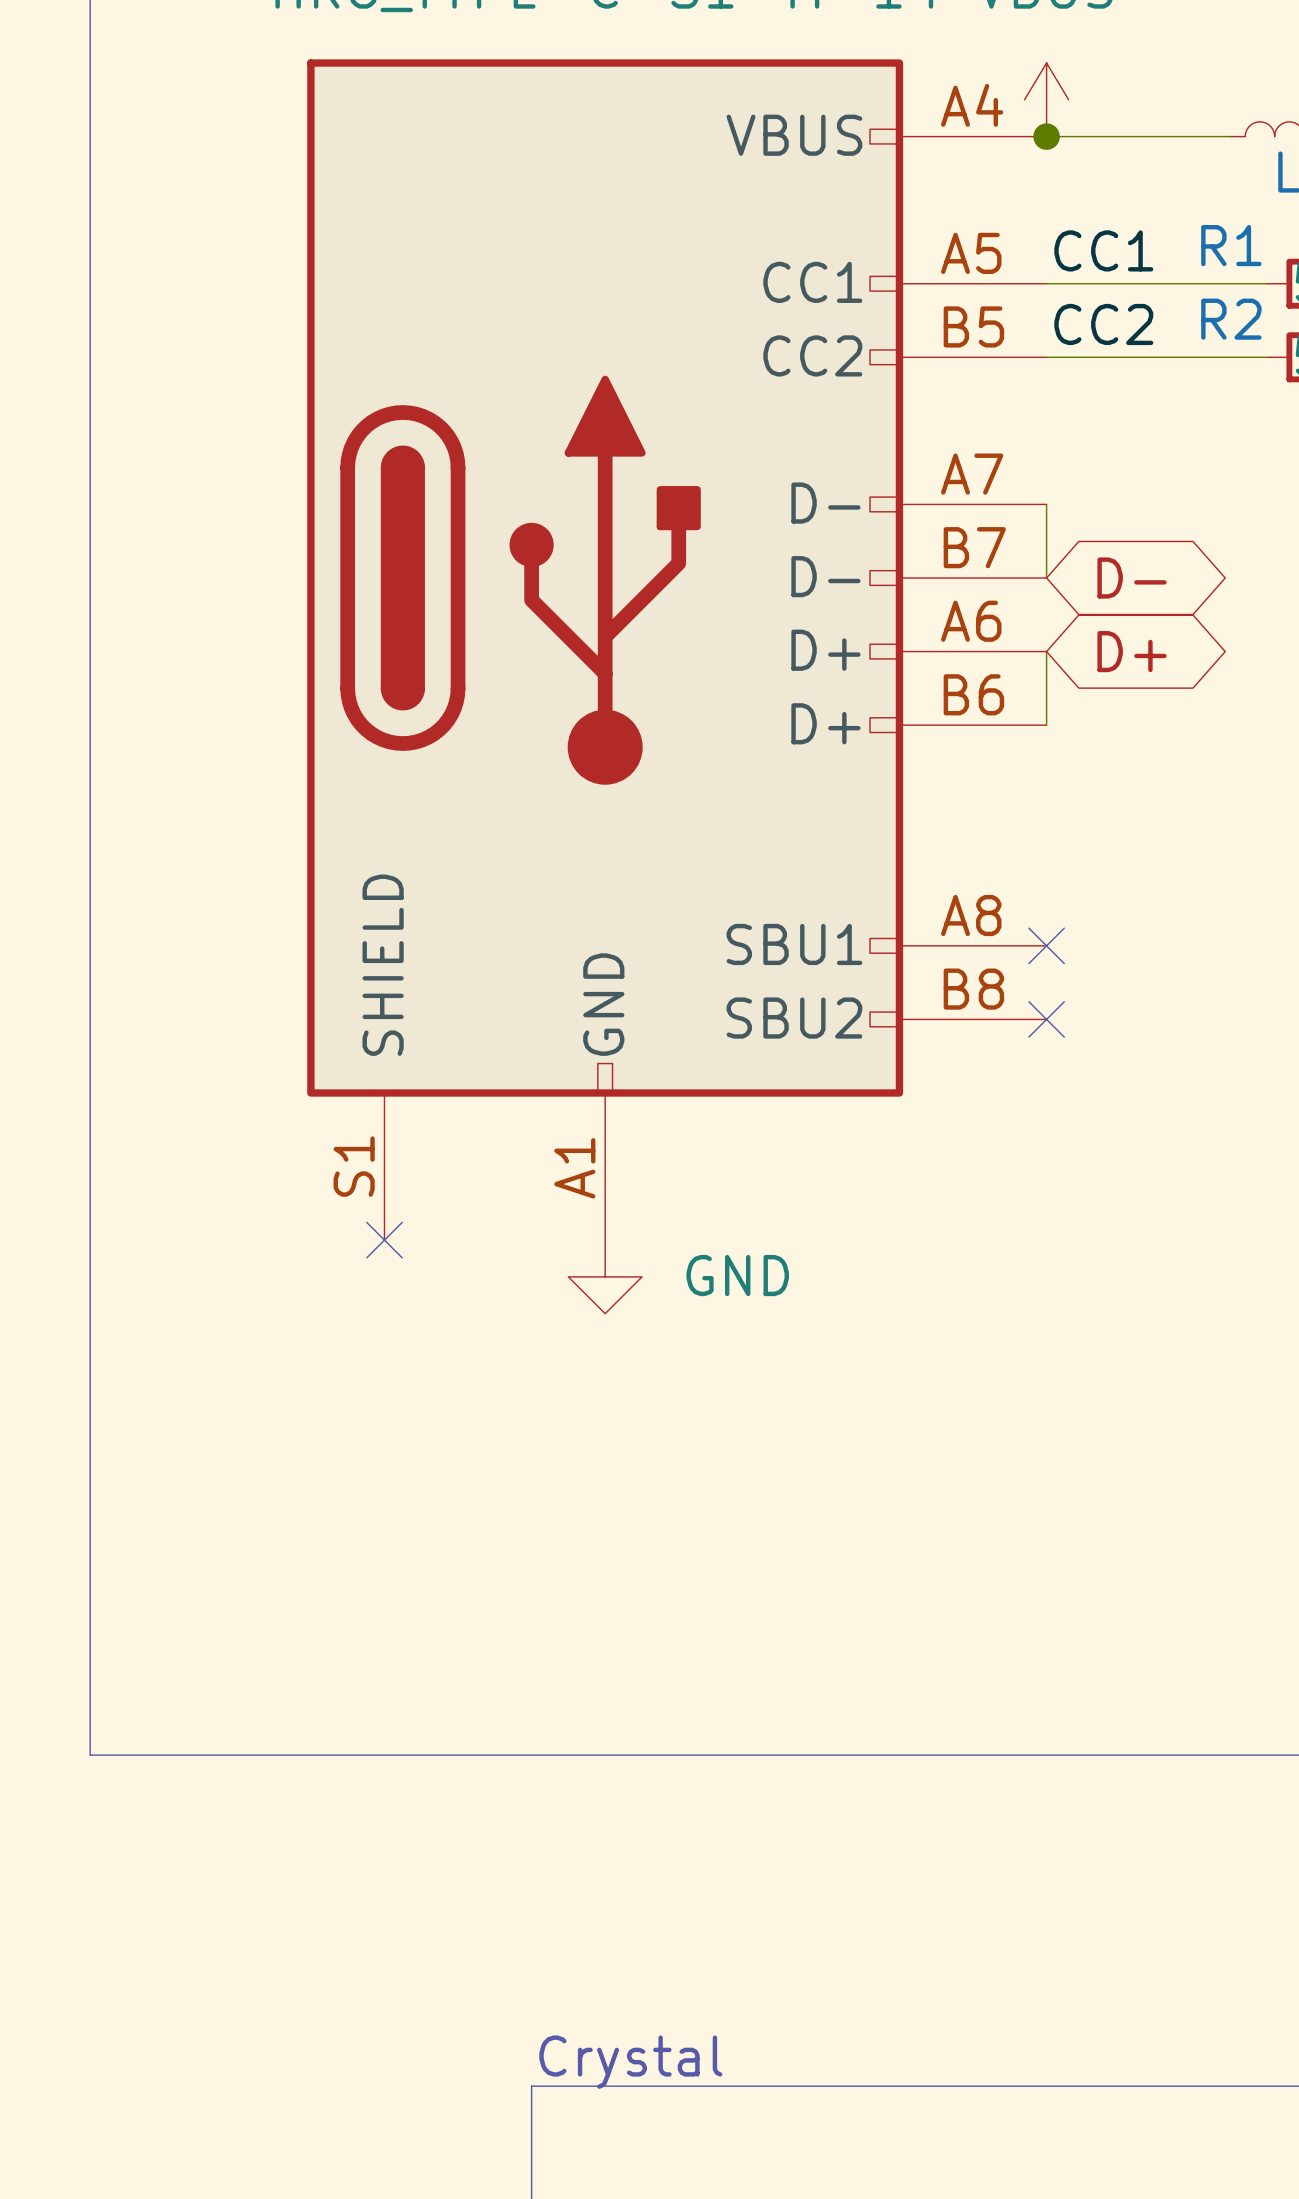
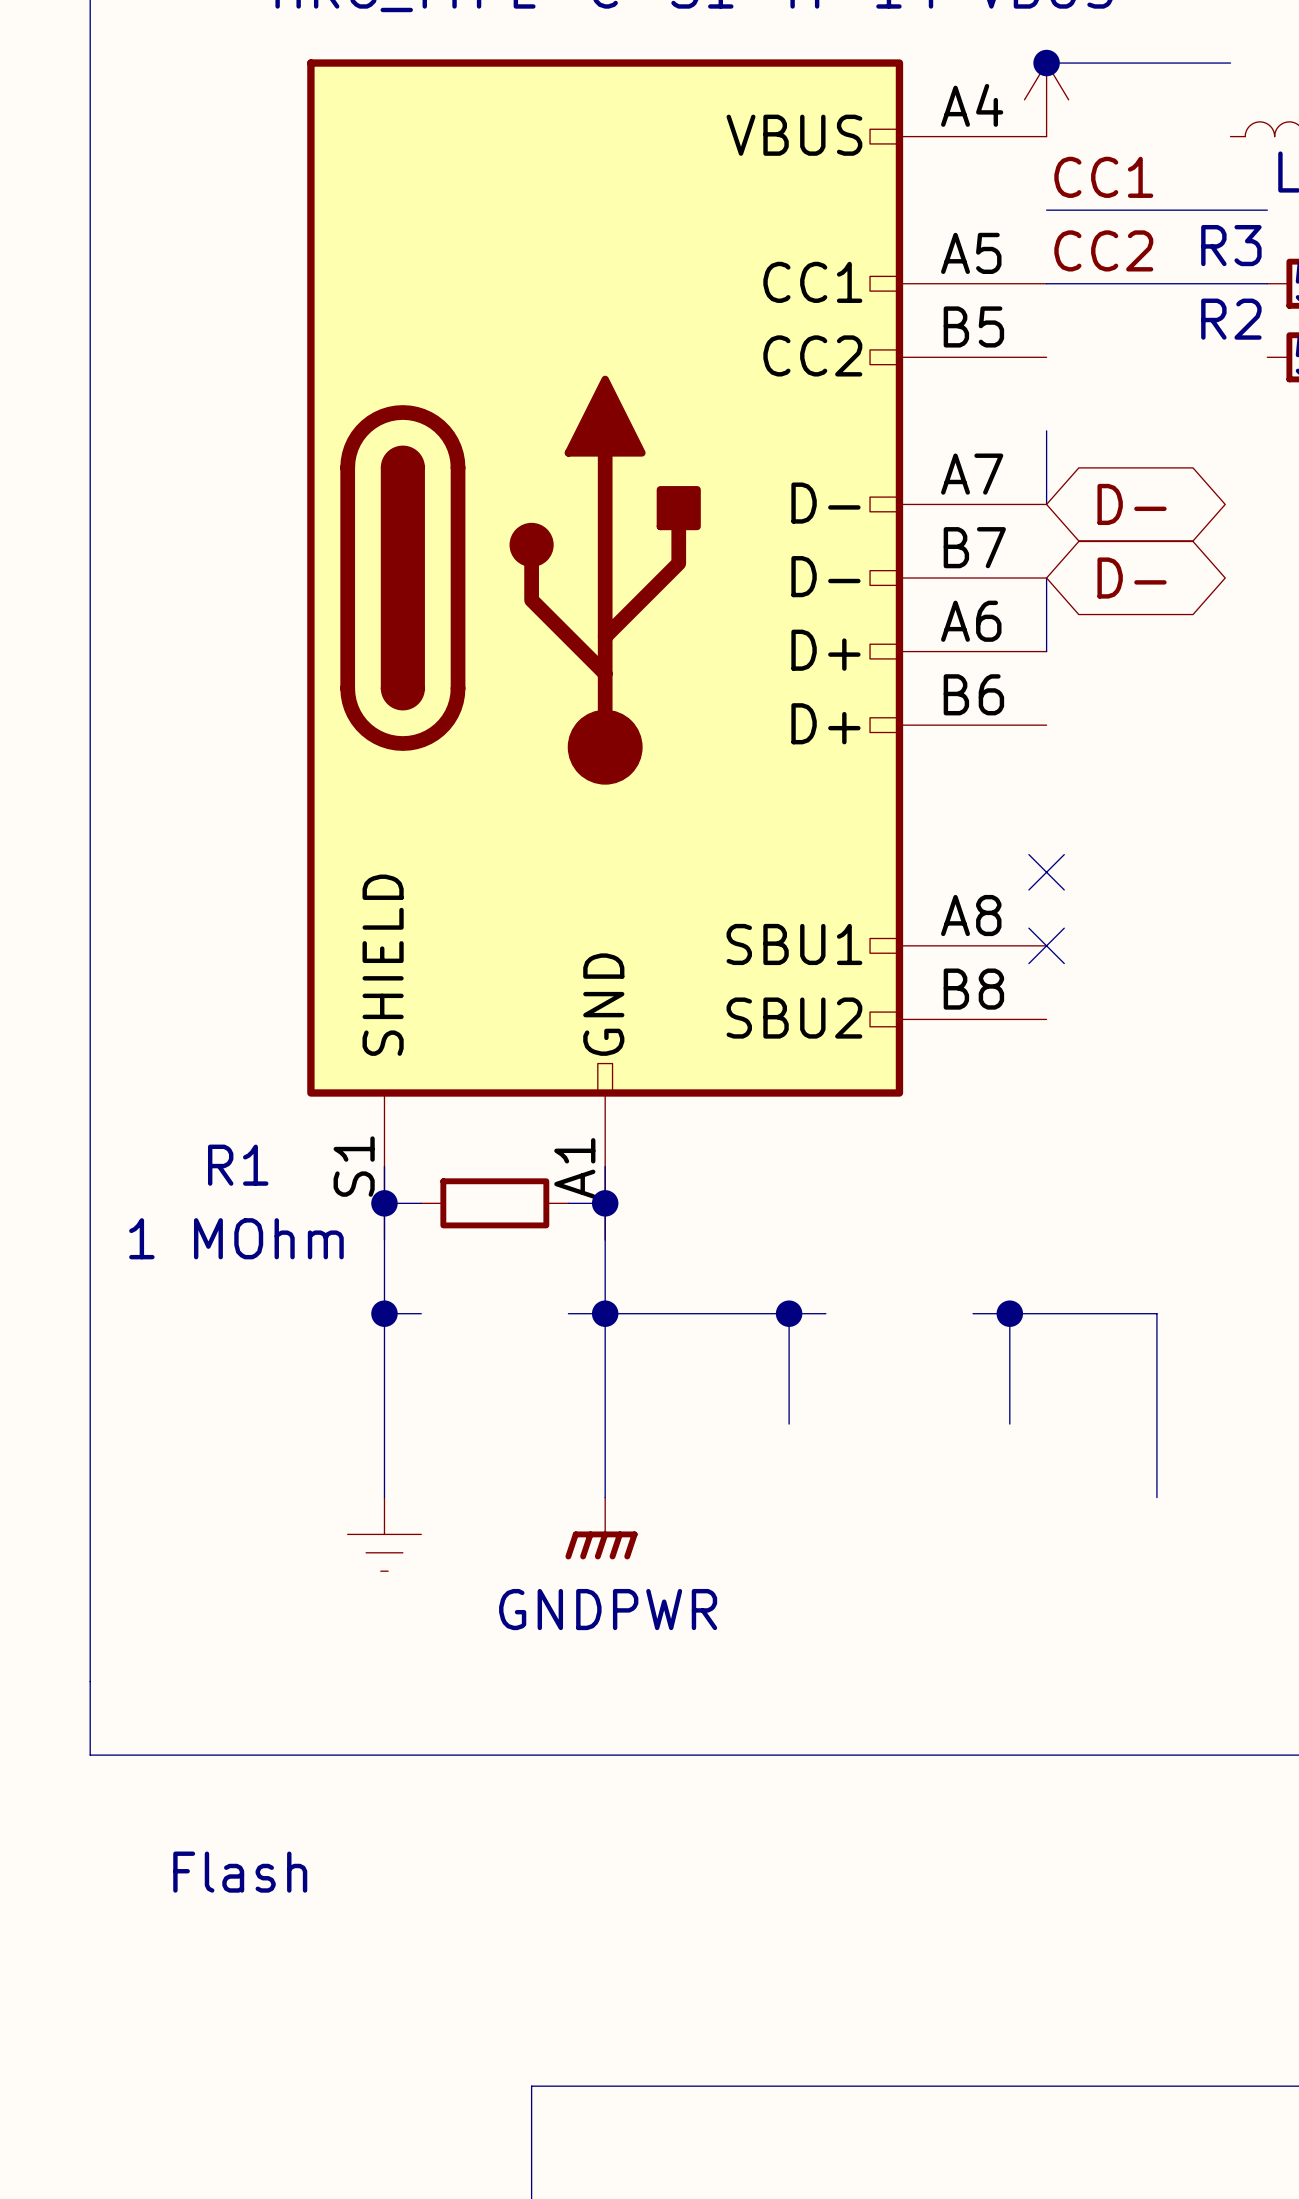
wire: (1046, 136) (1230, 136) -> (1046, 63) (1230, 63)
junction position: (1046, 136) -> (1046, 63)
label: none -> CC1 (1103, 177)
R1 name: R1 (1231, 245) -> R3 (1231, 245)
label: CC1 (1103, 250) -> CC2 (1103, 250)
label: CC2 (1103, 324) -> none
wire: (1046, 357) (1267, 357) -> (1046, 210) (1267, 210)
wire: (1046, 504) (1046, 578) -> (1046, 504) (1046, 430)
global label: none -> D- (1132, 504)
wire: (1046, 651) (1046, 725) -> (1046, 651) (1046, 578)
global label: D+ (1132, 651) -> none
no-connect mark position: (1046, 1019) -> (1046, 872)
wire: none -> (384, 1166) (384, 1497)
wire: none -> (605, 1166) (605, 1497)
wire: none -> (384, 1203) (421, 1203)
junction: none -> (384, 1203)
R1: none -> 1 MOhm (494, 1203)
wire: none -> (568, 1203) (605, 1203)
junction: none -> (605, 1203)
no-connect mark: (384, 1240) -> none
power symbol: GND (605, 1276) -> none
wire: none -> (384, 1313) (421, 1313)
junction: none -> (384, 1313)
wire: none -> (568, 1313) (825, 1313)
junction: none -> (605, 1313)
wire: none -> (789, 1313) (789, 1424)
junction: none -> (789, 1313)
wire: none -> (973, 1313) (1156, 1313) (1156, 1497)
wire: none -> (1009, 1313) (1009, 1424)
junction: none -> (1009, 1313)
power symbol: none -> GNDPWR (601, 1528)
power symbol: none -> (384, 1534)
text: none -> Flash (240, 1872)
text: Crystal (630, 2062) -> none

